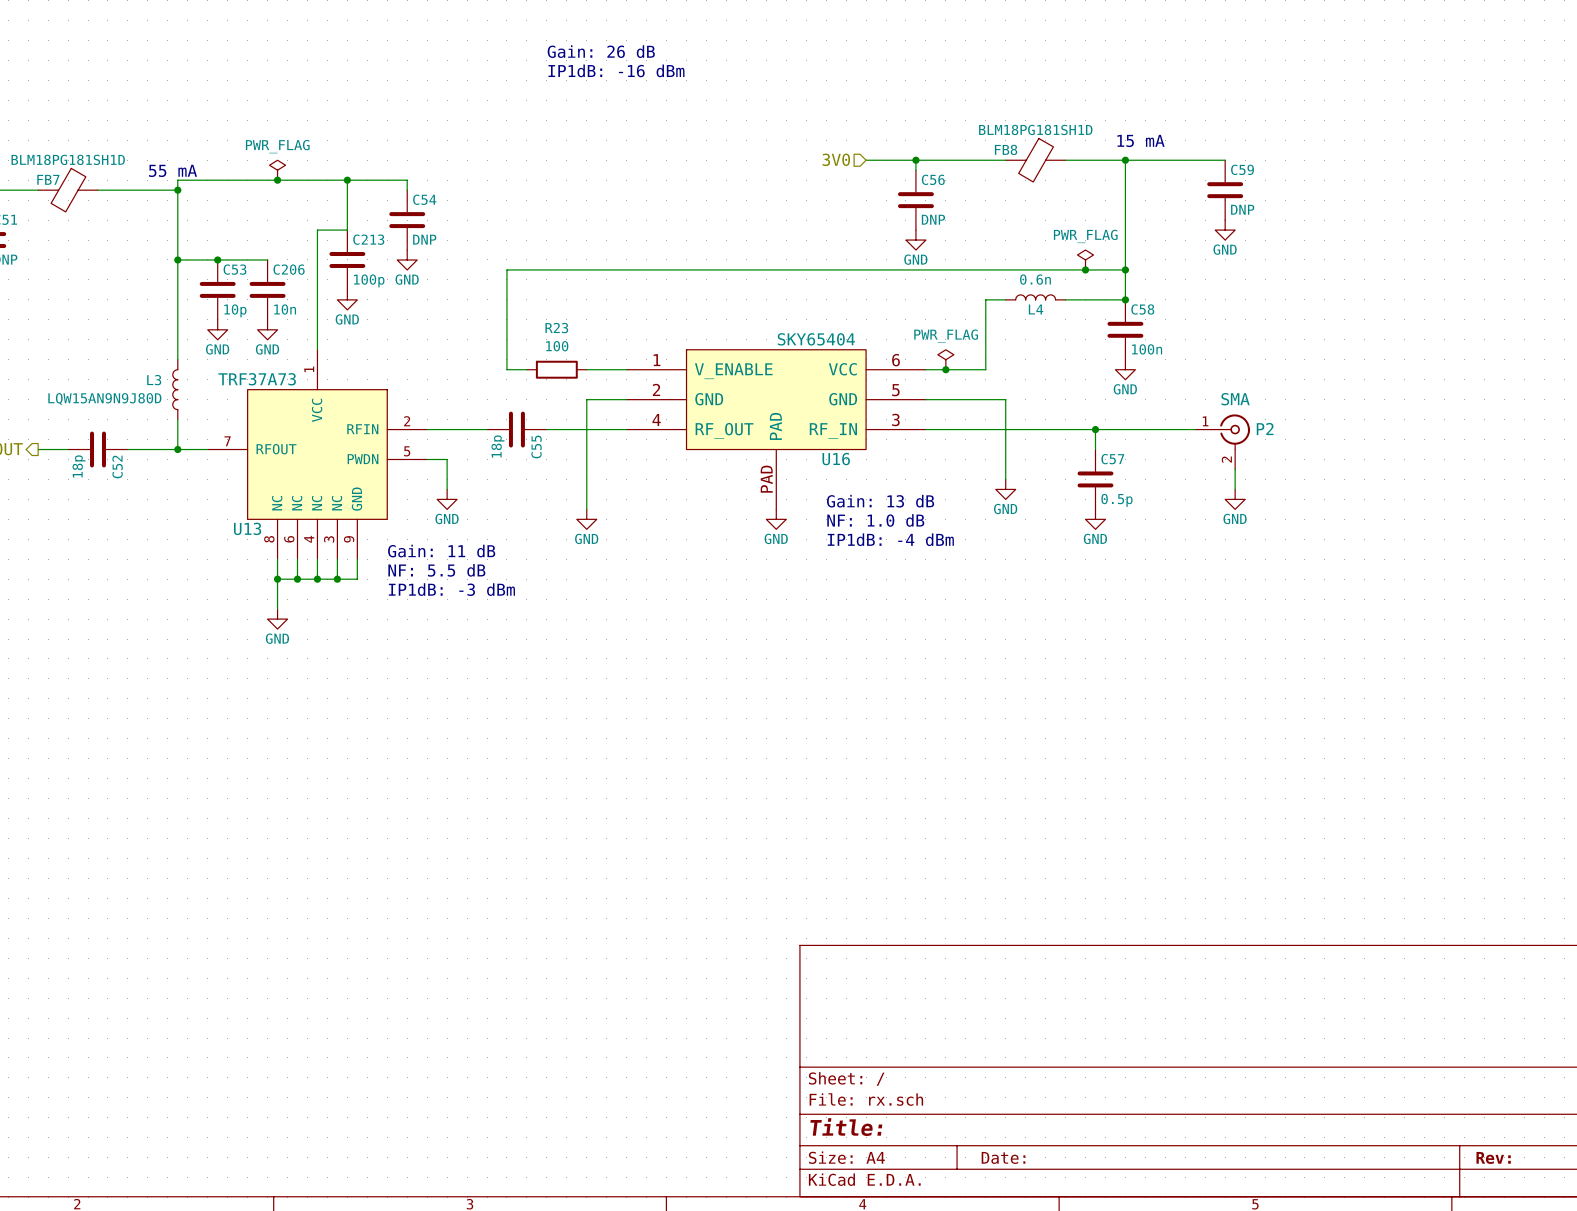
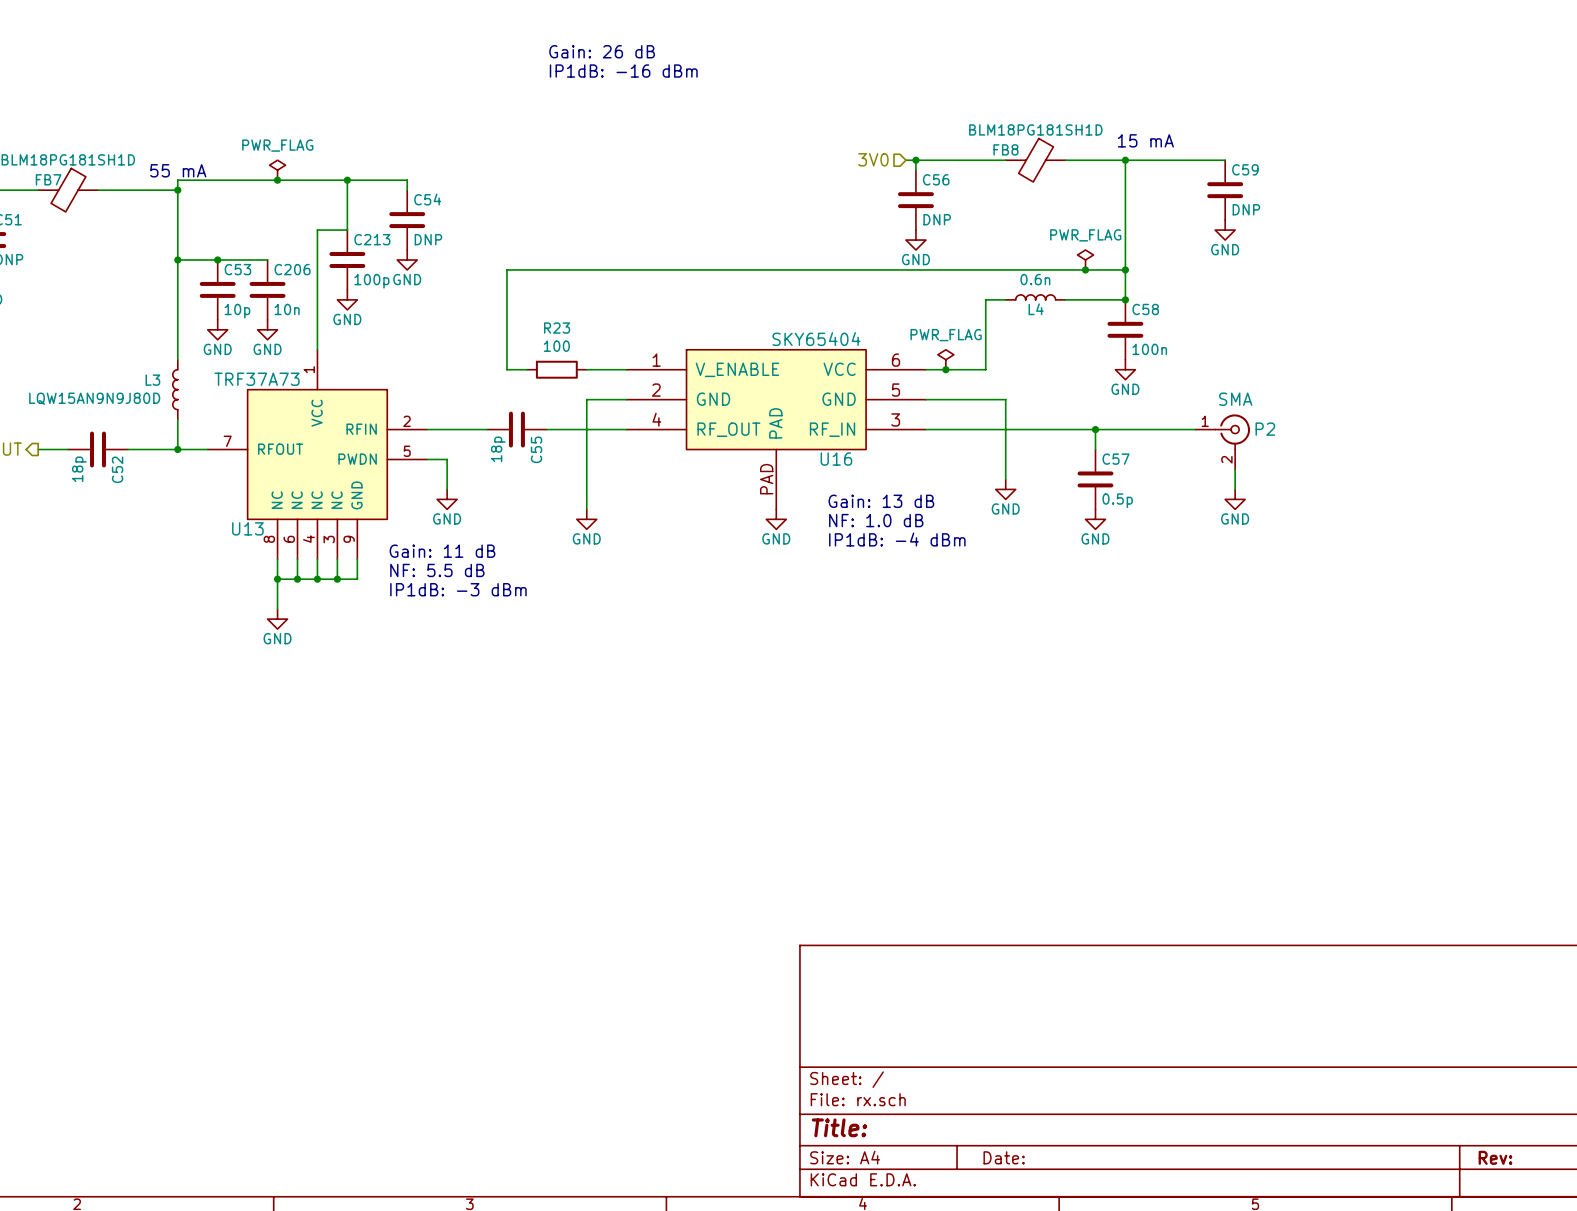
hierarchical label position: 3V0 (836, 159) -> 3V0 (873, 159)
wire: (866, 160) (905, 160) -> none

